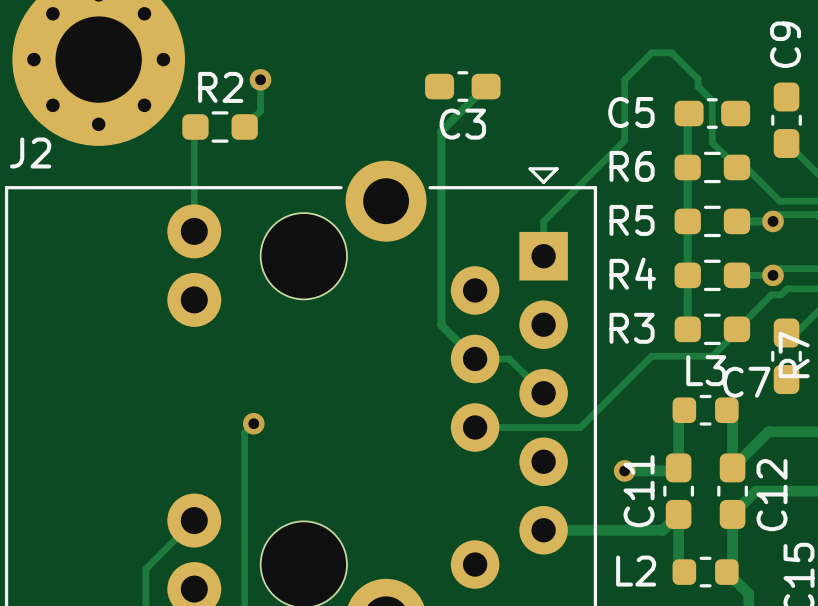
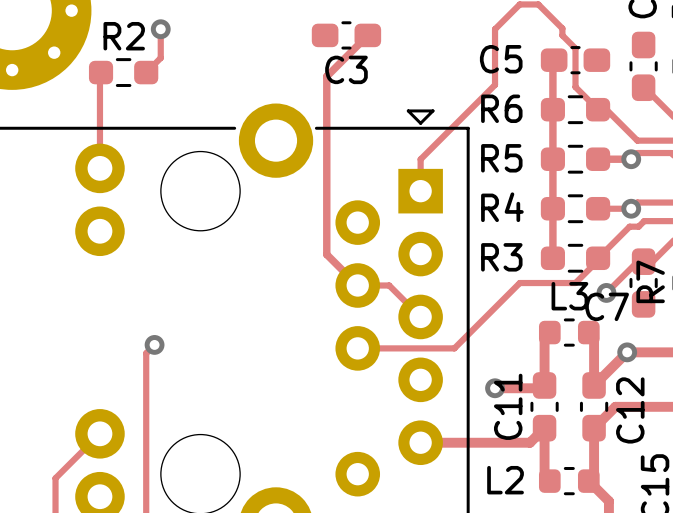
track: none -> (643, 261) (637, 261) (606, 292)
via: none -> (606, 292)
via: none -> (627, 352)

